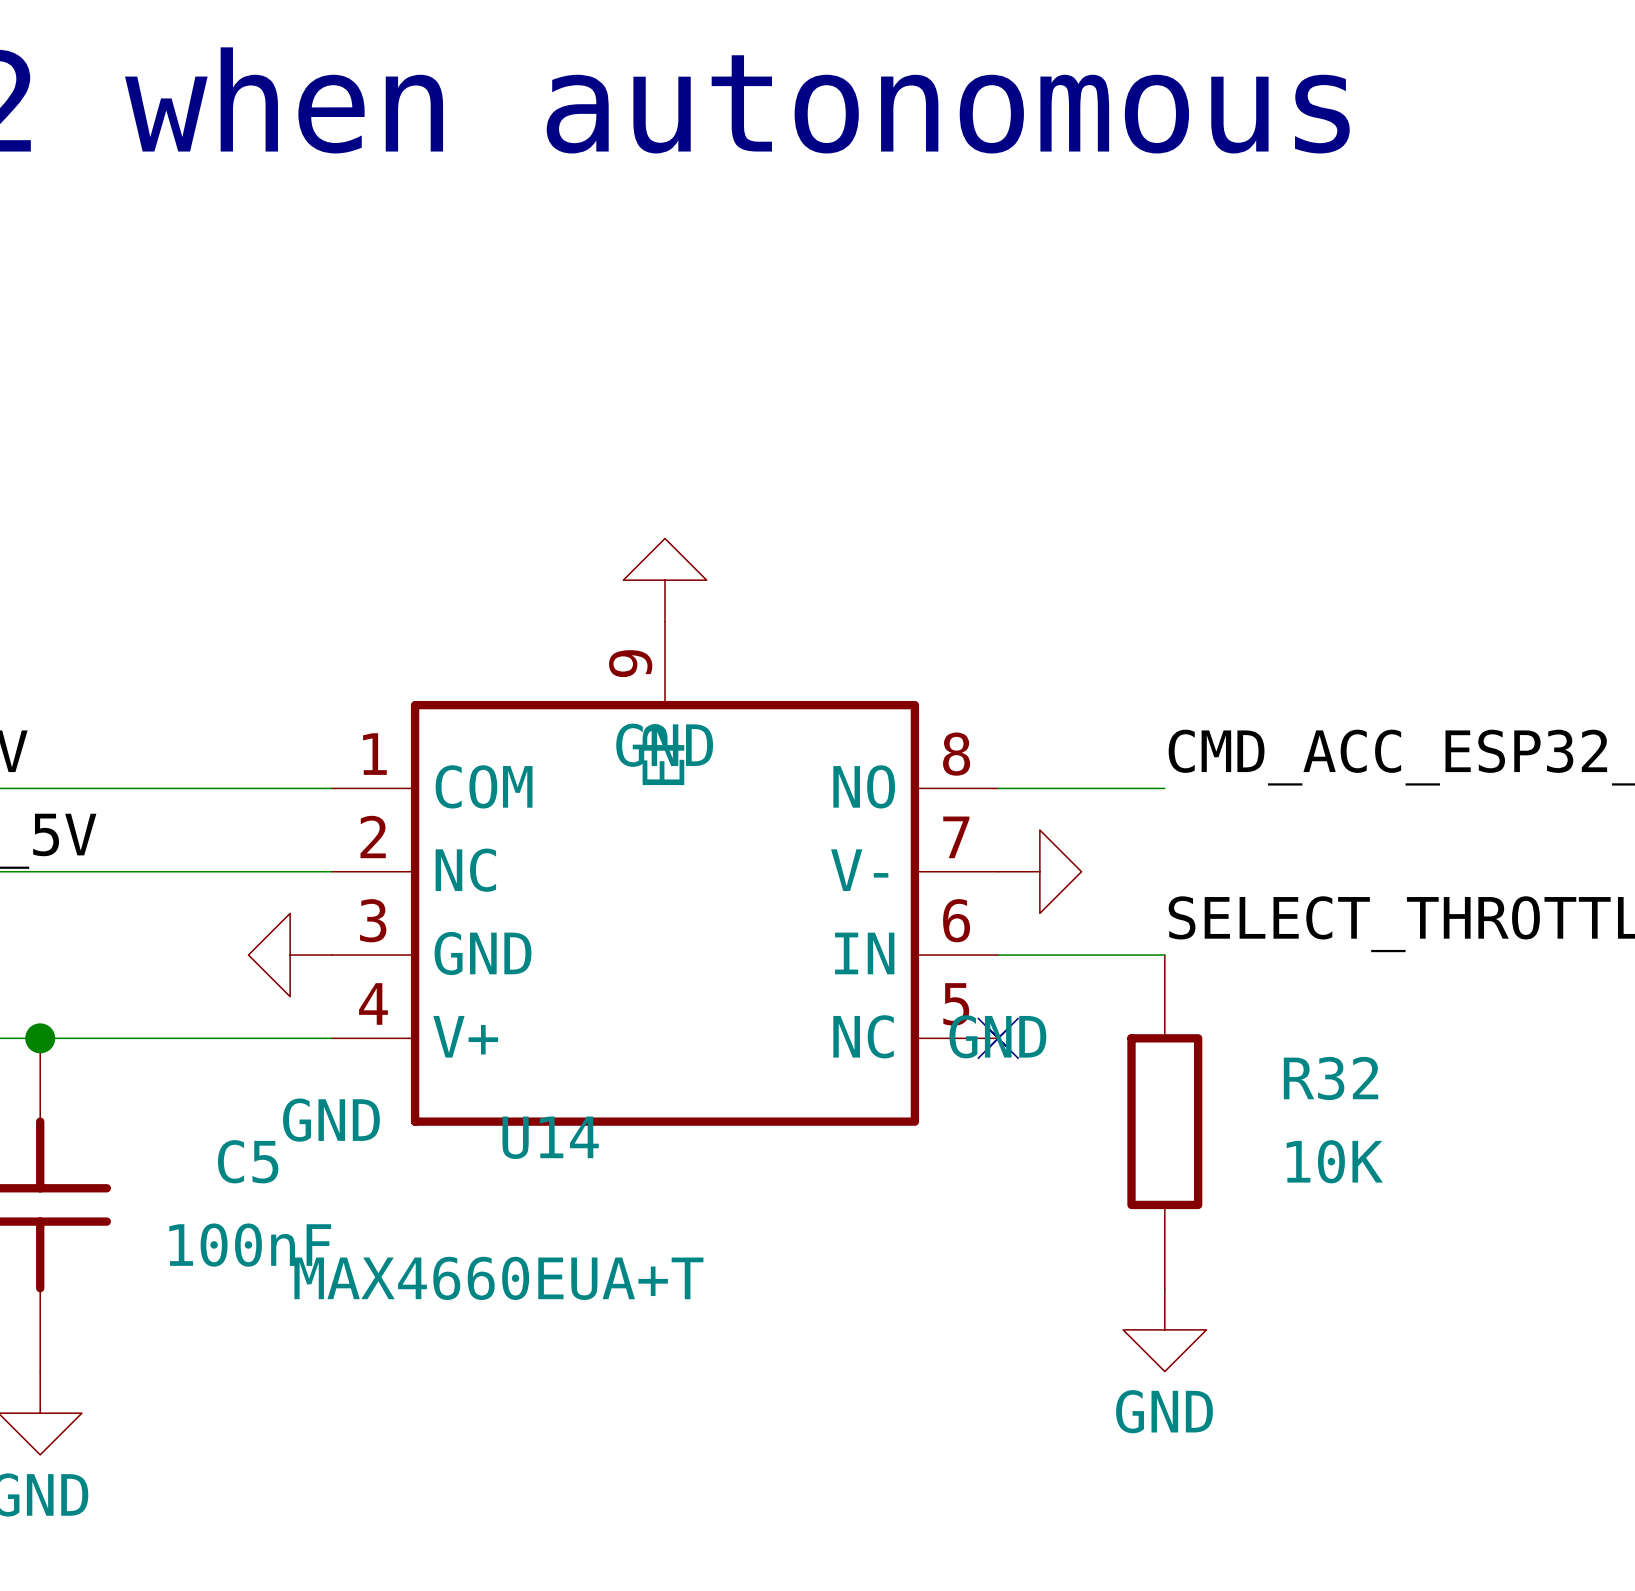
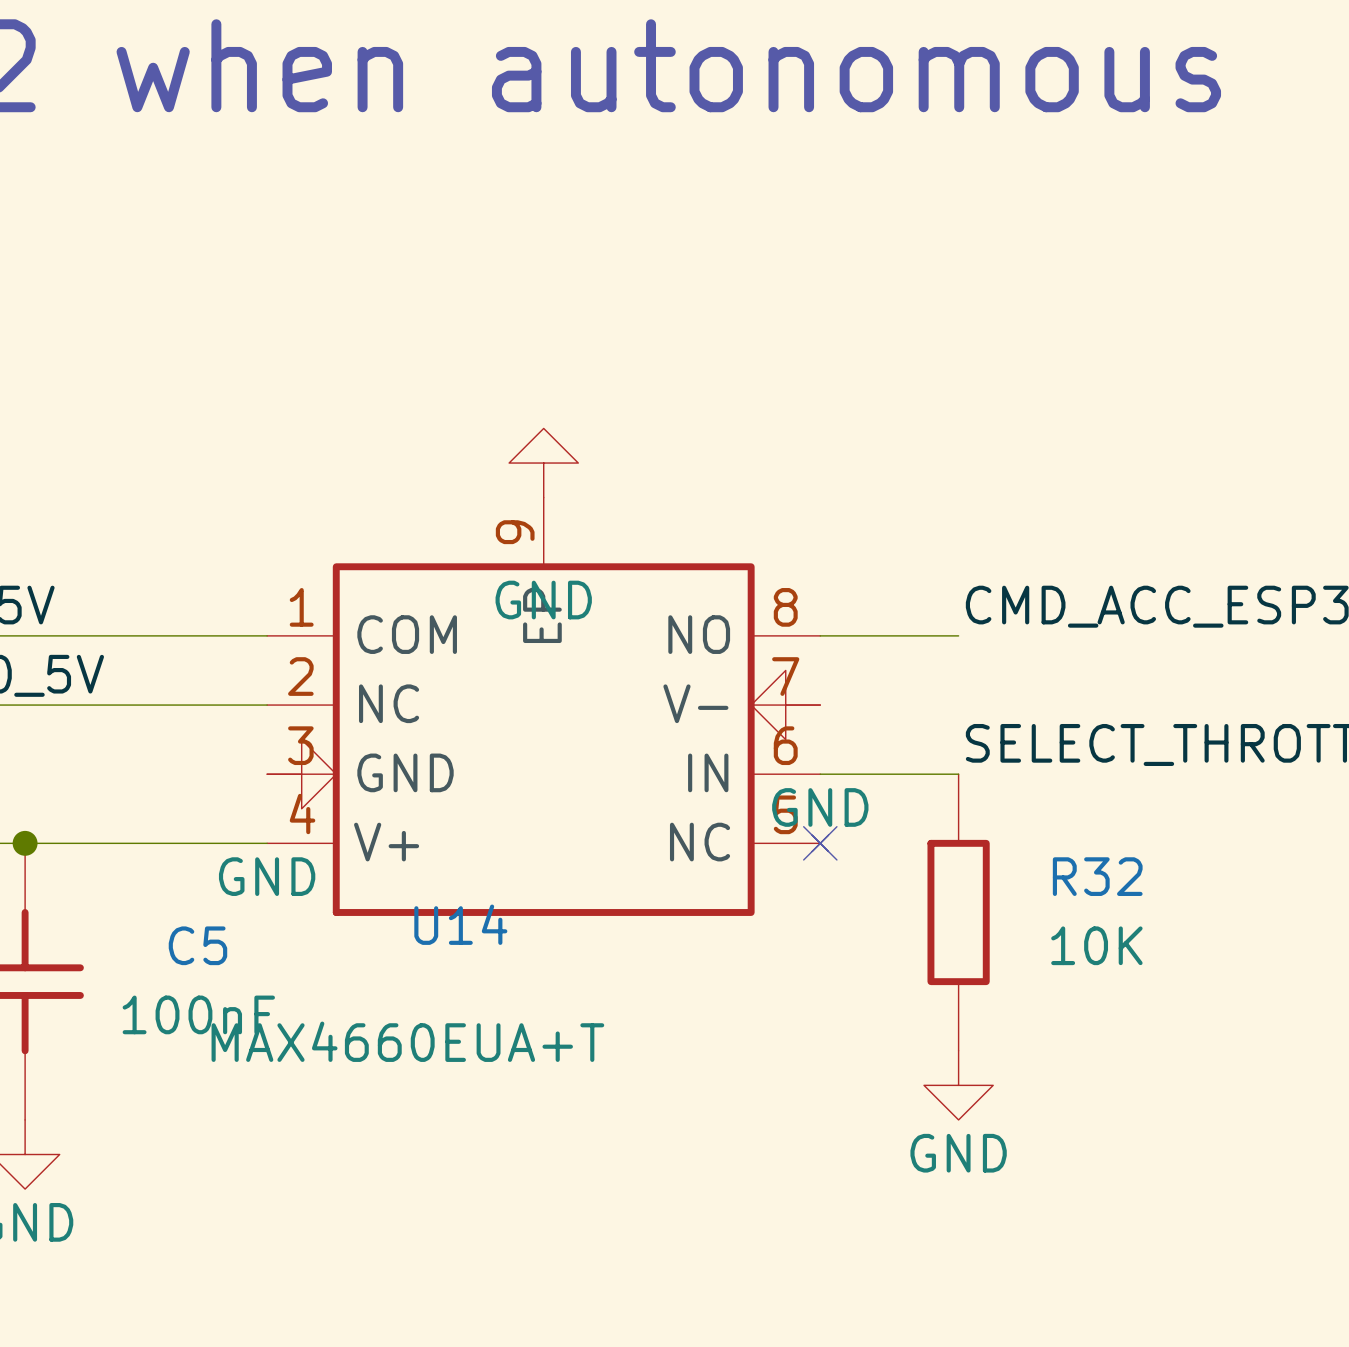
power symbol rotation: 0° (1039, 871) -> 180° (785, 705)
power symbol position: GND (1039, 871) -> GND (785, 705)
power symbol rotation: 0° (290, 955) -> 180° (301, 774)
power symbol position: GND (290, 955) -> GND (301, 774)
power symbol text position: GND (997, 1036) -> GND (820, 807)
power symbol text position: GND (331, 1120) -> GND (267, 876)

